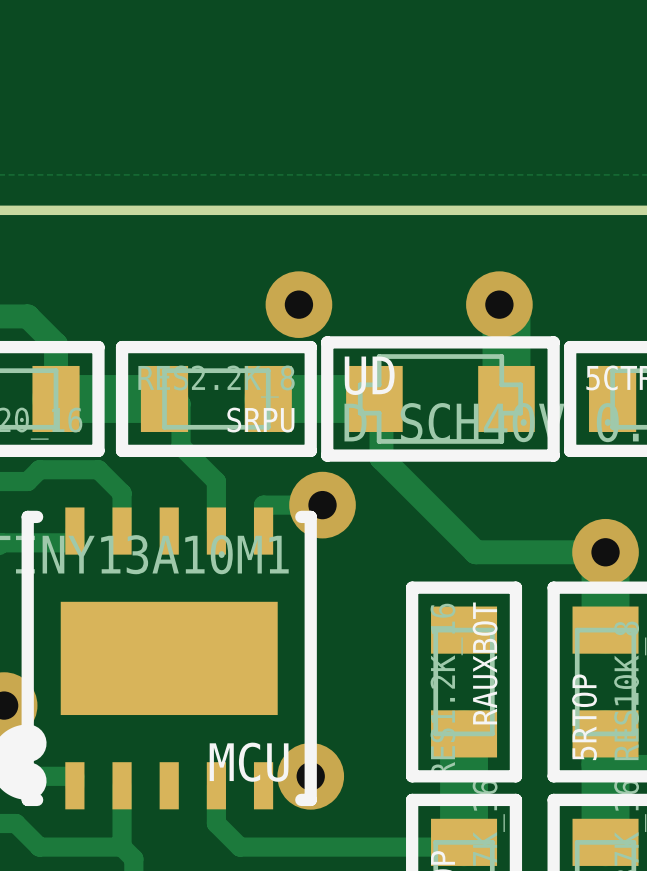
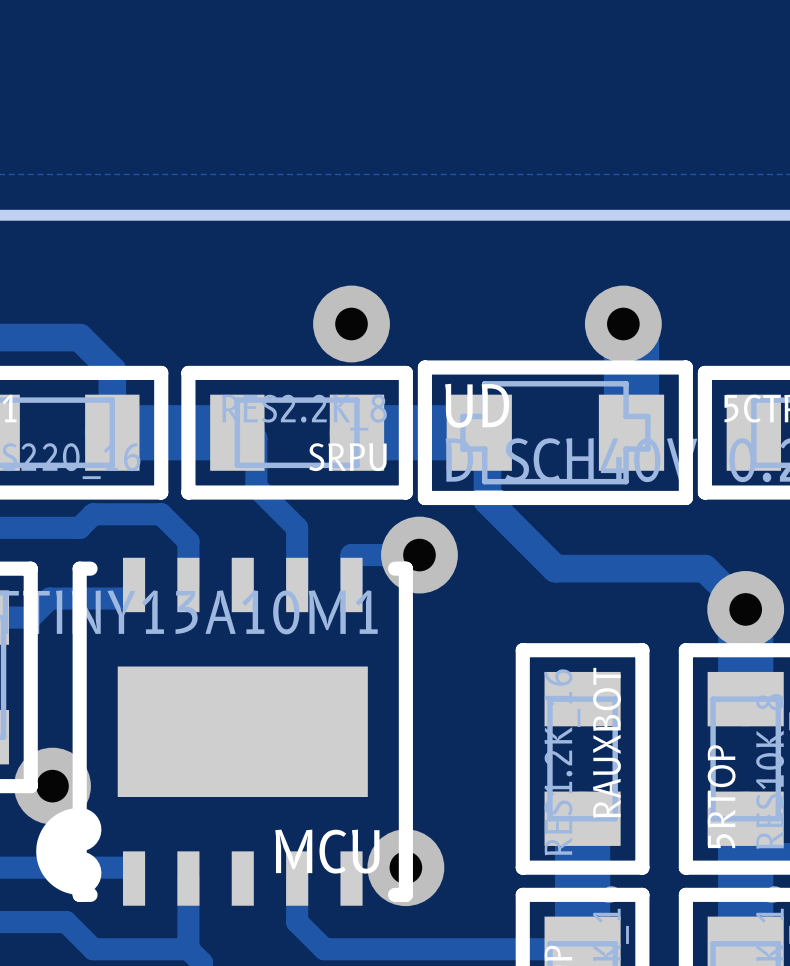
via position: (298, 304) -> (351, 324)
track: (440, 516) (475, 552) (605, 552) -> (555, 568) (704, 568) (745, 609)

